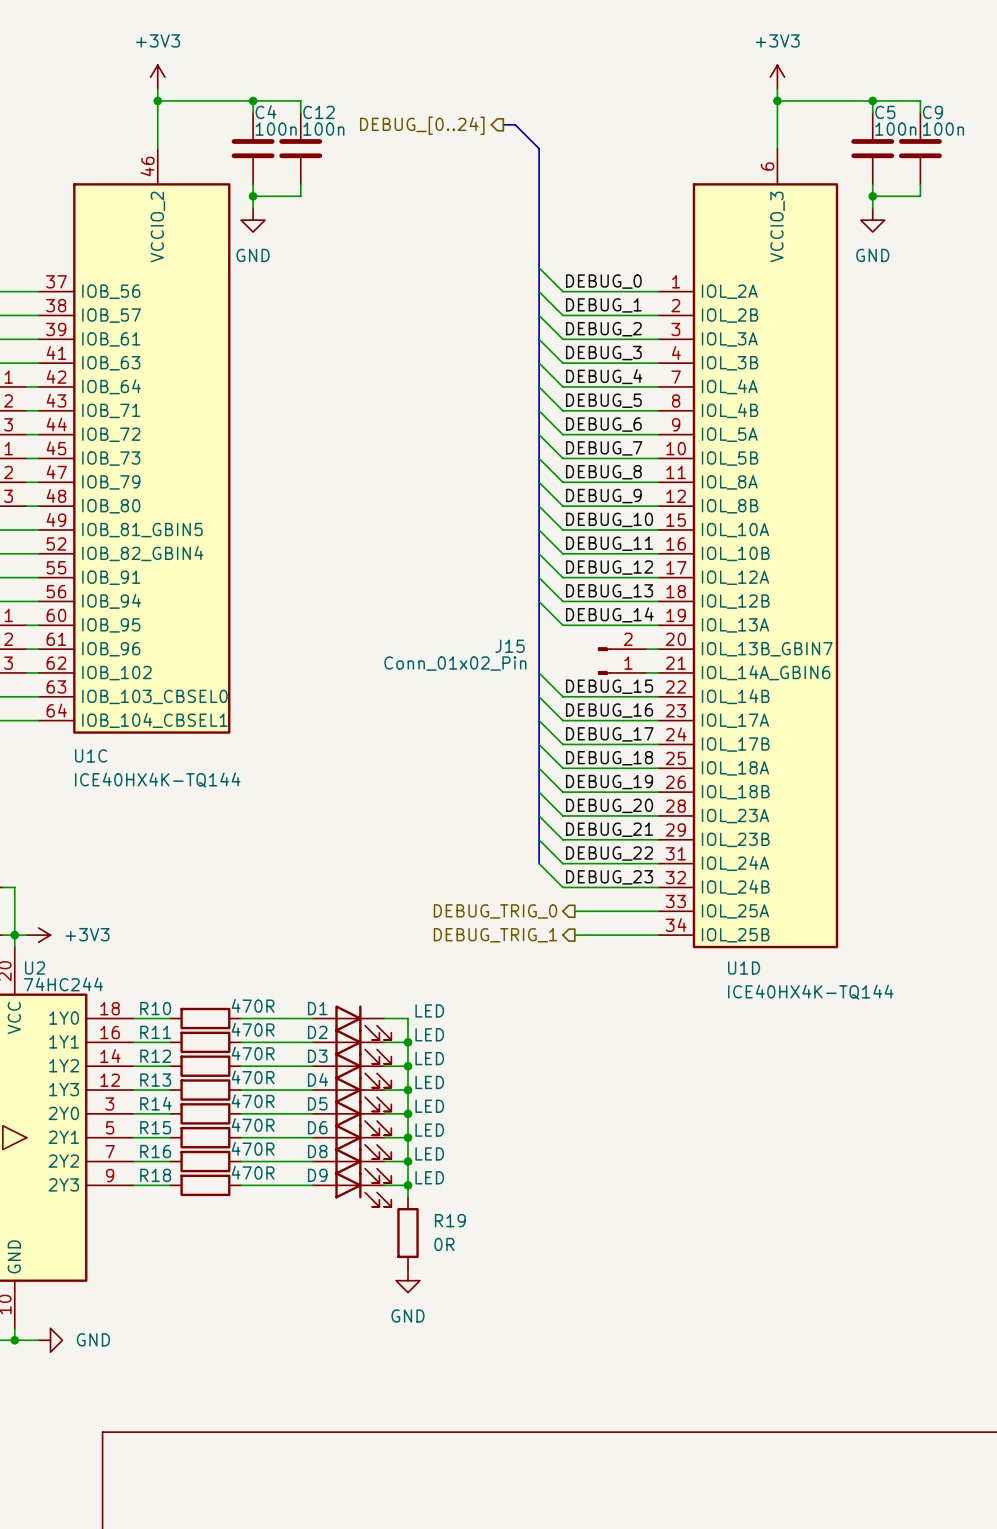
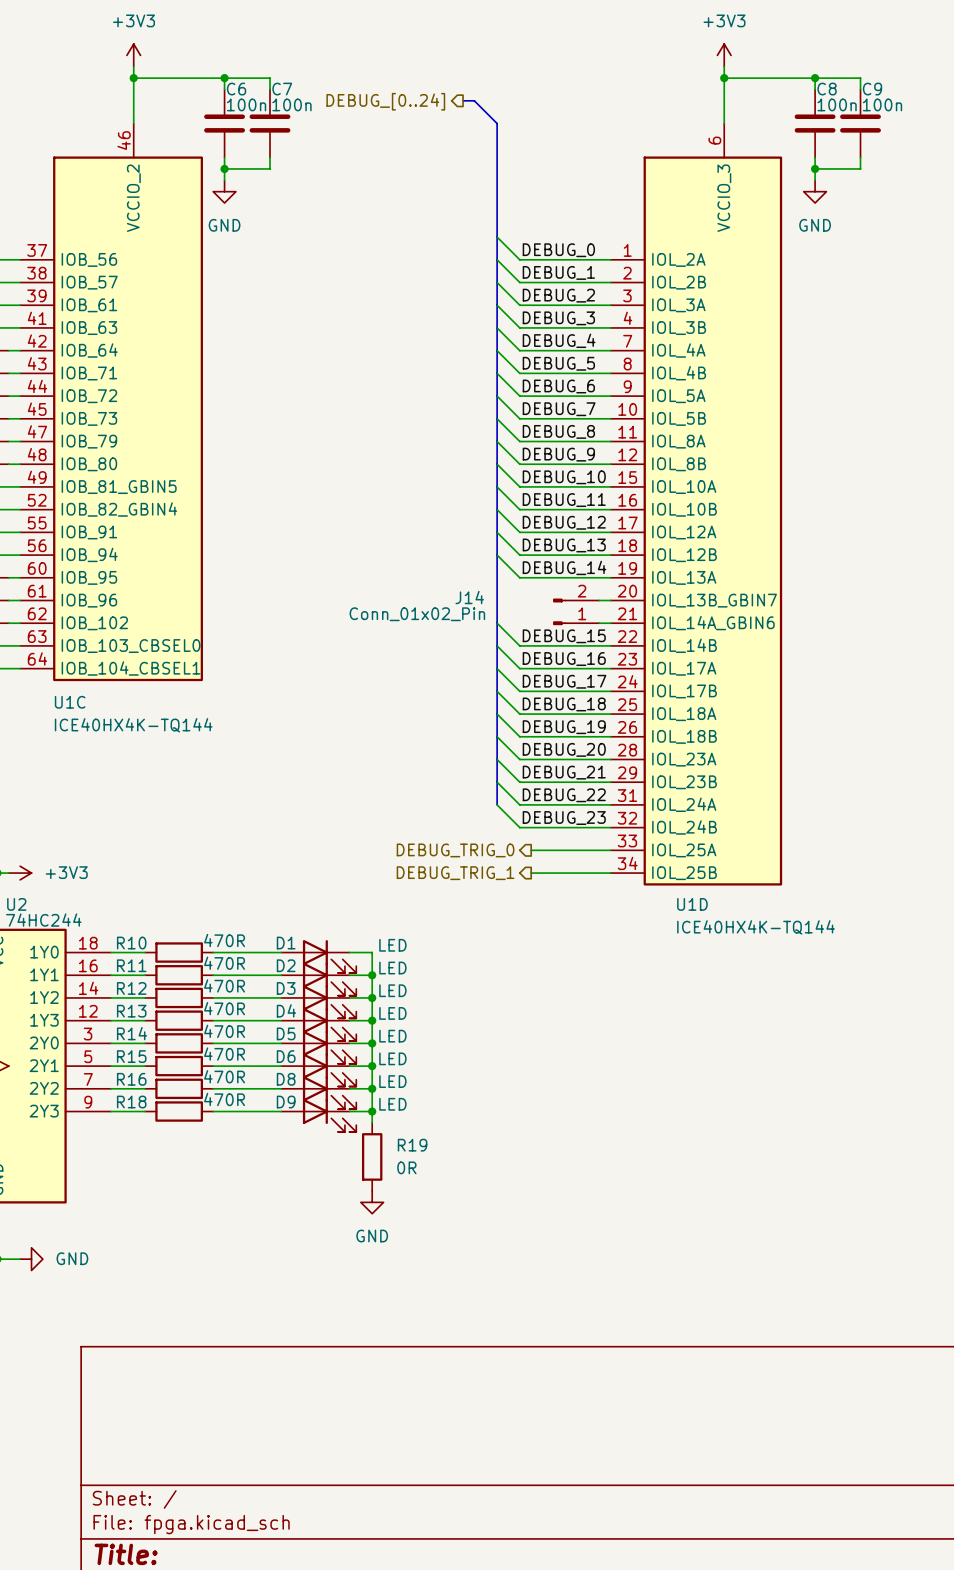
C4 name: C4 (265, 112) -> C6 (236, 89)
C12 name: C12 (319, 112) -> C7 (282, 89)
C5 name: C5 (885, 112) -> C8 (827, 89)
J15 name: J15 (510, 646) -> J14 (469, 597)

